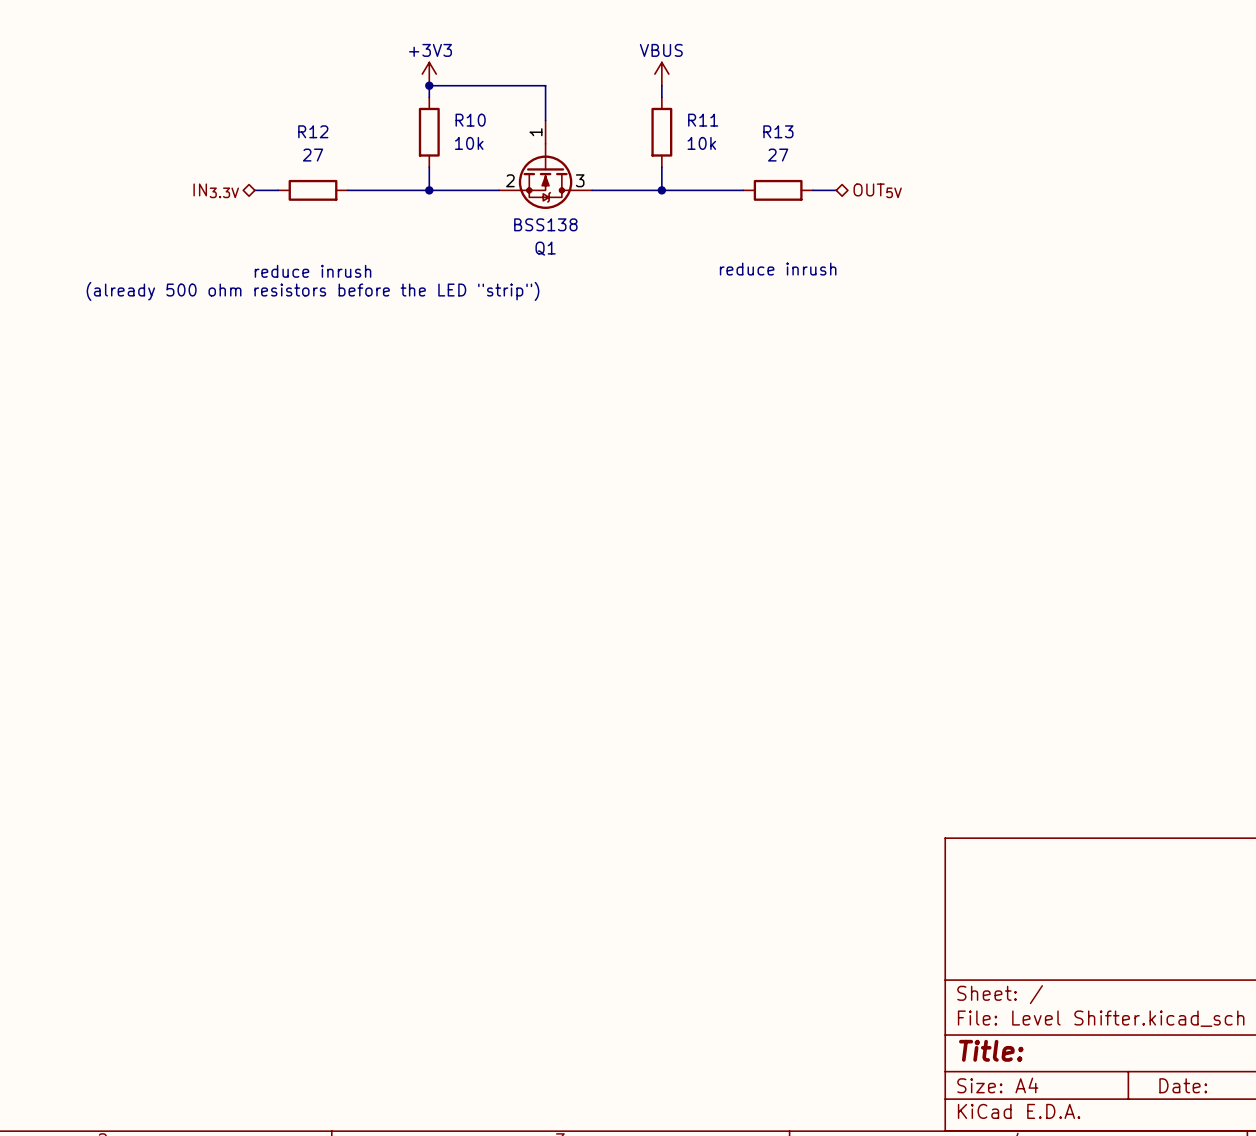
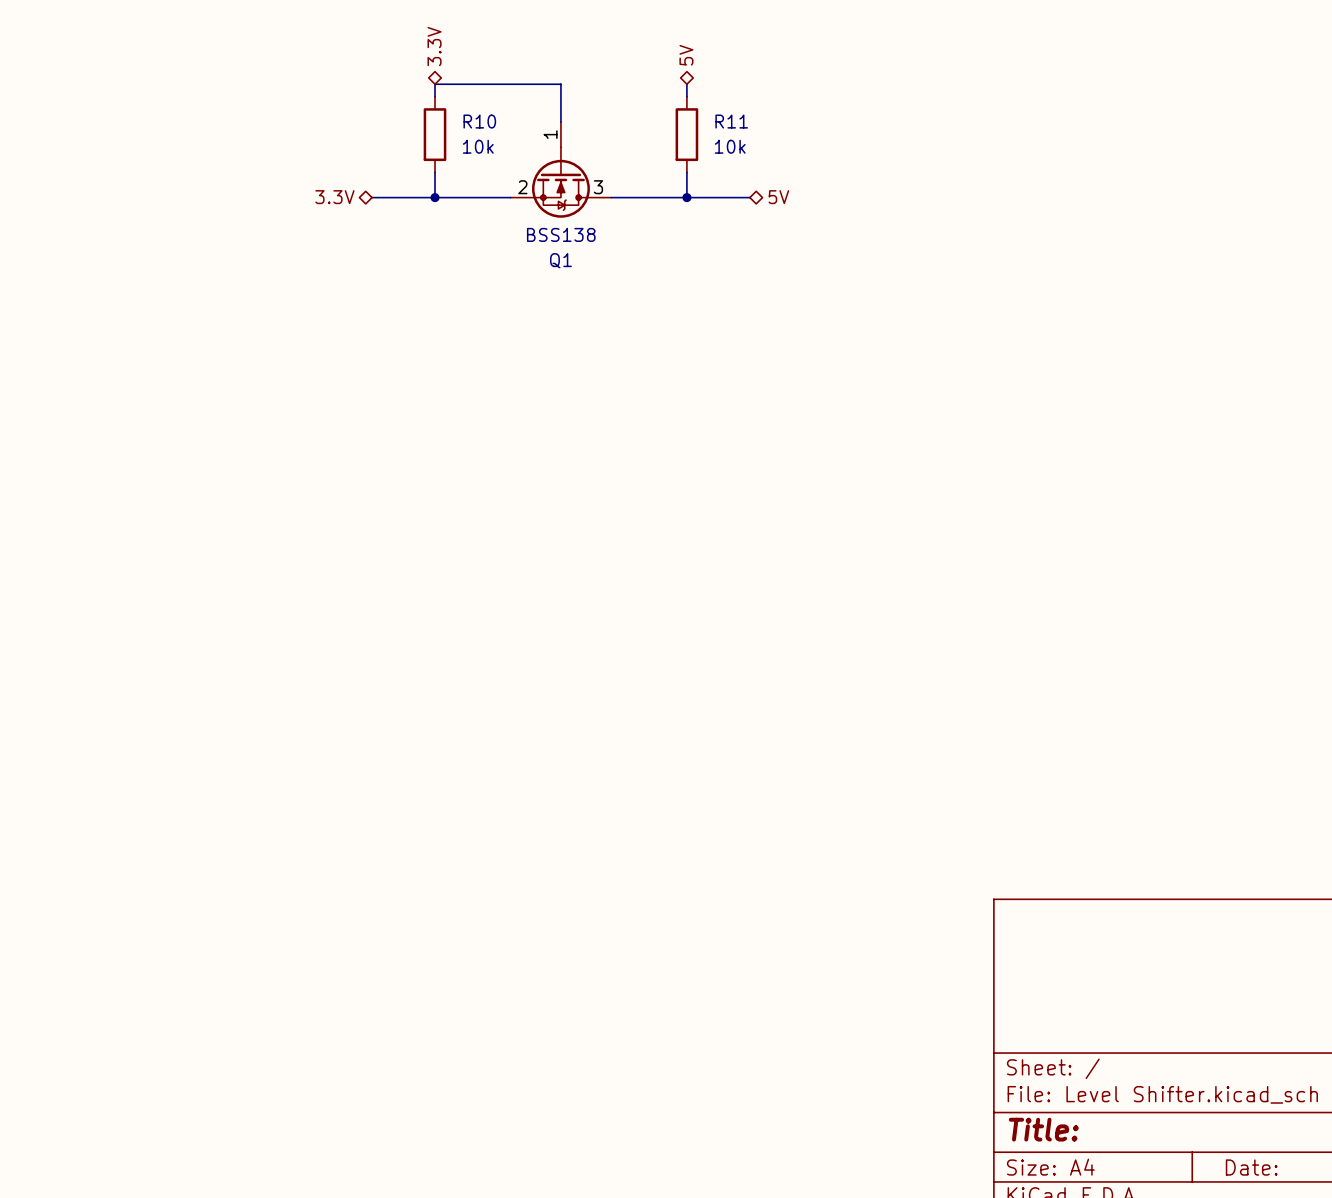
hierarchical label: none -> 3.3V (434, 46)
hierarchical label: none -> 5V (686, 55)
power symbol: +3V3 (429, 74) -> none
power symbol: VBUS (661, 74) -> none
junction: (429, 85) -> none
hierarchical label: none -> 3.3V (334, 197)
hierarchical label: none -> 5V (778, 197)
hierarchical label: IN3.3V (216, 190) -> none
wire: (254, 190) (278, 190) -> none
R12: 27 (313, 190) -> none
wire: (347, 190) (371, 190) -> none
wire: (720, 190) (743, 190) -> none
R13: 27 (778, 190) -> none
wire: (813, 190) (836, 190) -> none
hierarchical label: OUT5V (877, 190) -> none
text: reduce inrush (778, 269) -> none
text: reduce inrush (313, 271) -> none
text: (already 500 ohm resistors before the LED "strip") (313, 291) -> none

